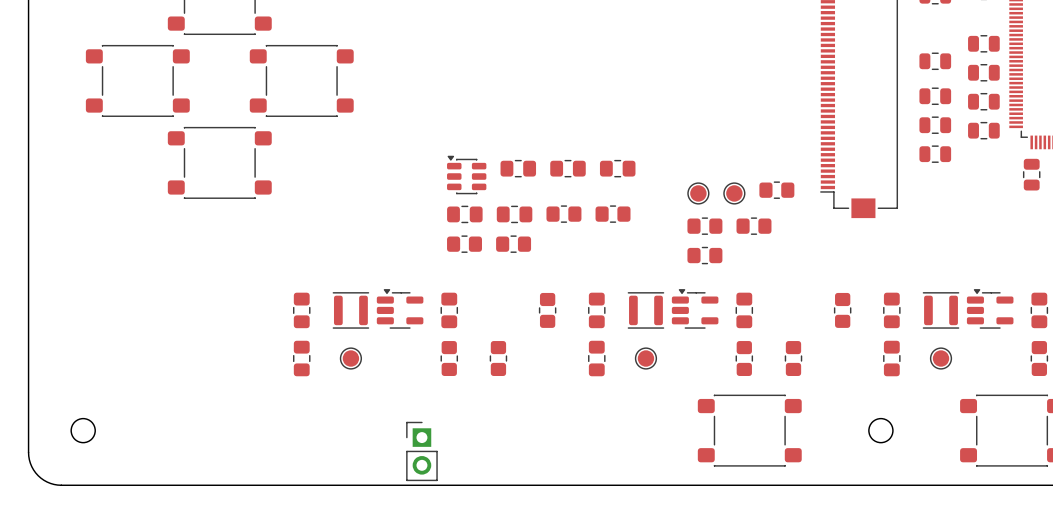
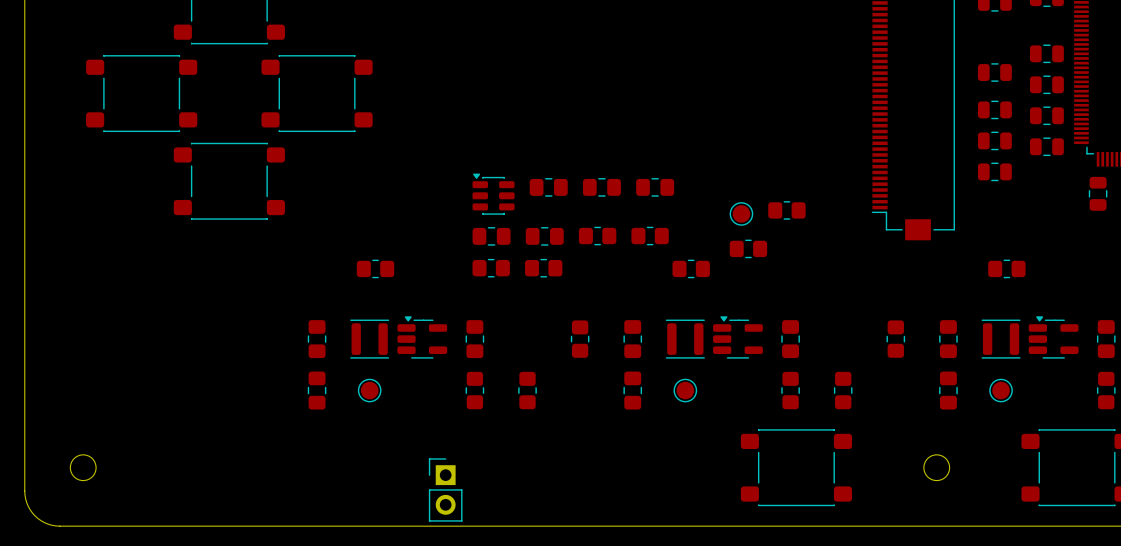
part footprint: [723, 182, 746, 205] -> [768, 201, 806, 220]
part: (776, 190) -> none
part: (753, 226) -> none
part: none -> (375, 268)
part: none -> (691, 268)
part: none -> (1006, 268)
part: (704, 255) -> none

